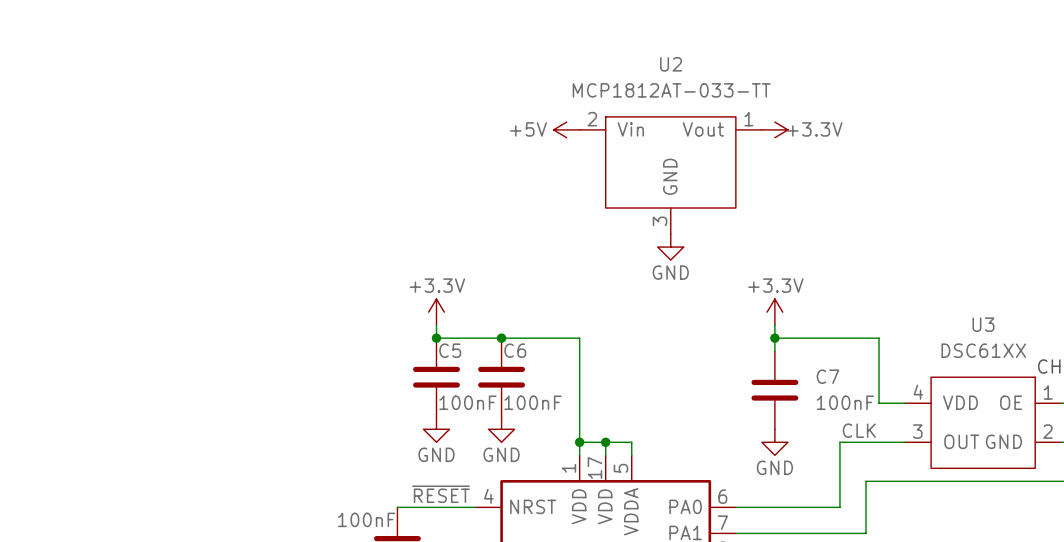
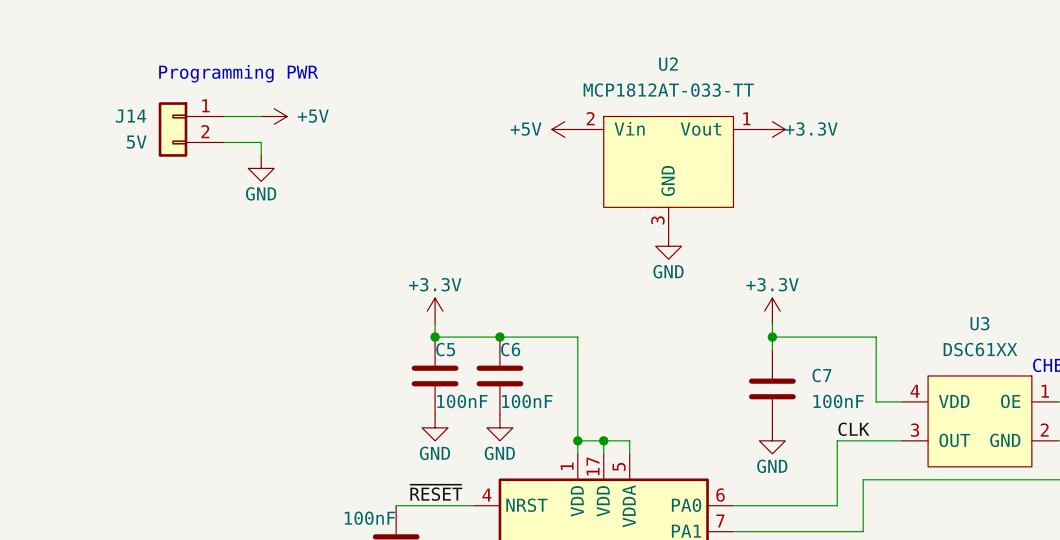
text: none -> Programming PWR (238, 73)
wire: none -> (224, 116) (261, 116)
power symbol: none -> +5V (274, 116)
J14: none -> 5V (191, 129)
wire: none -> (224, 142) (261, 142) (261, 155)
power symbol: none -> GND (261, 168)

